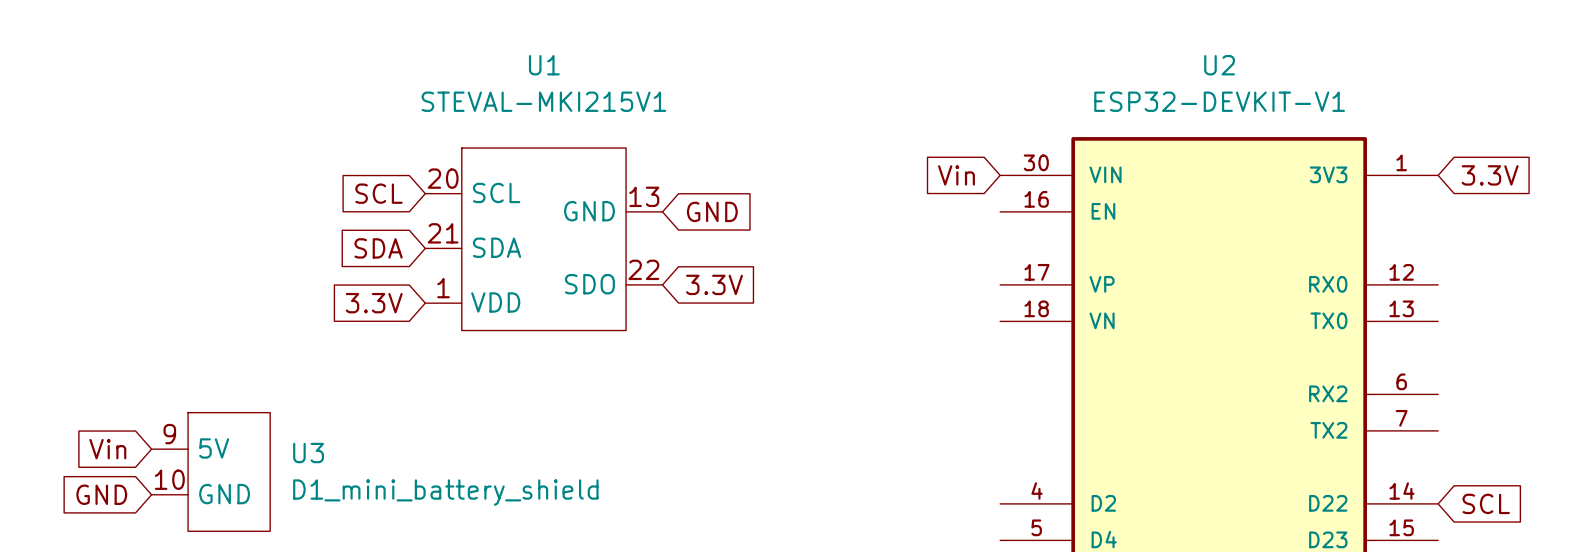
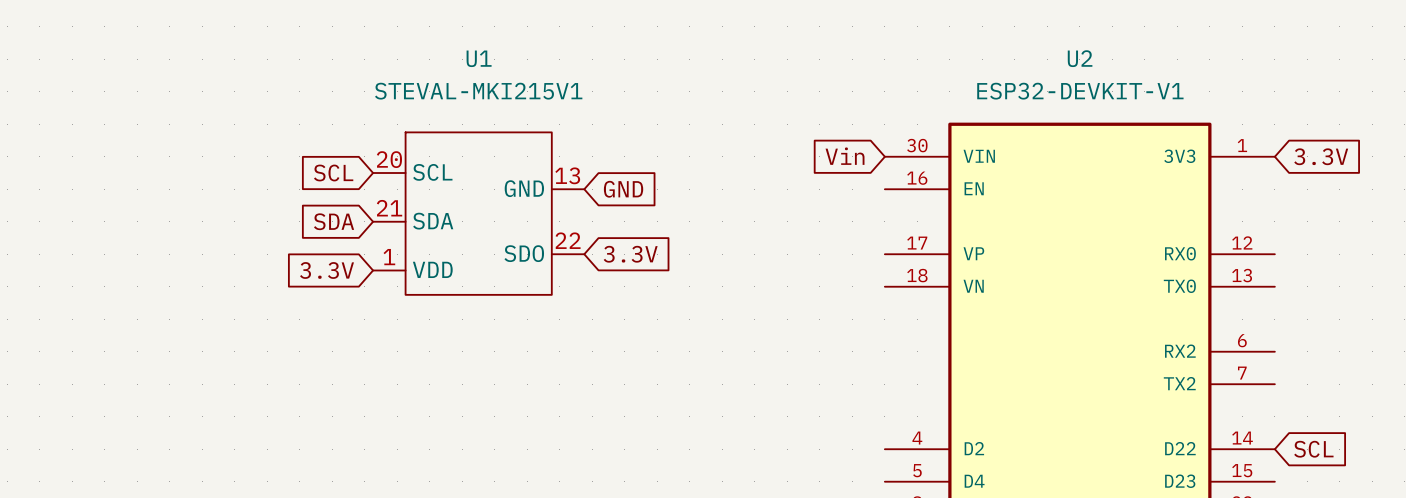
global label: Vin (107, 449) -> none
U3: D1_mini_battery_shield (210, 471) -> none
global label: GND (101, 494) -> none

